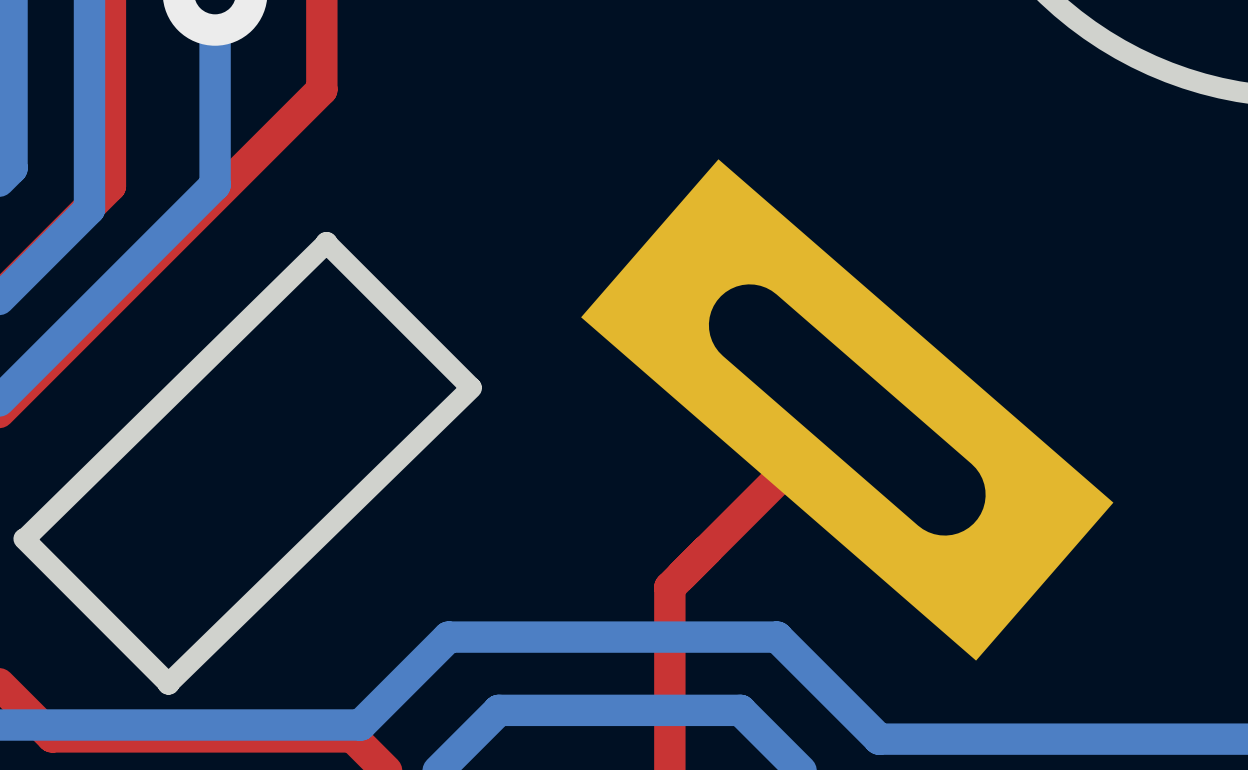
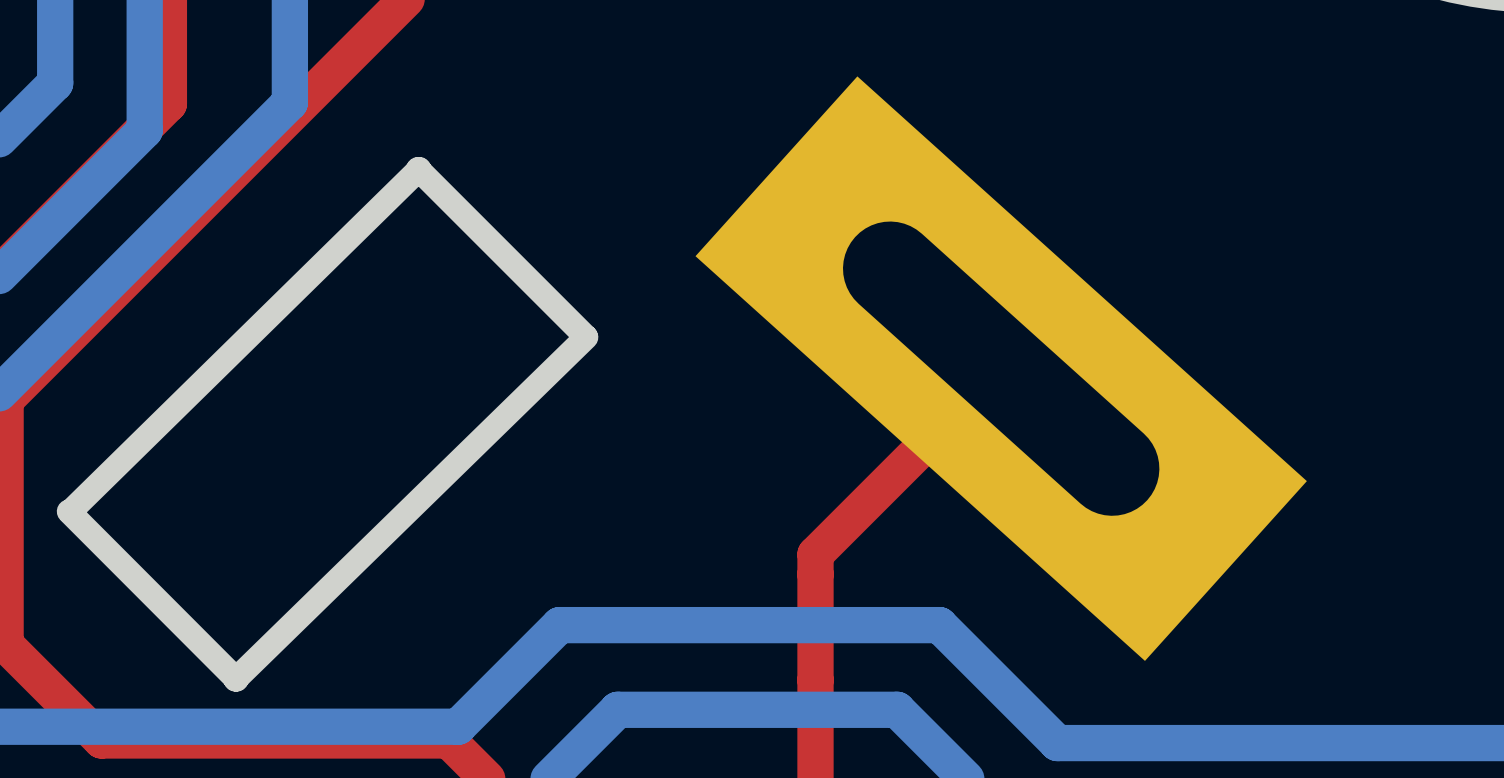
top track: (847, 409) (669, 587) -> (1001, 368) (815, 554) (815, 567)
part rotation: 0° (847, 409) -> 1° clockwise (1001, 368)

